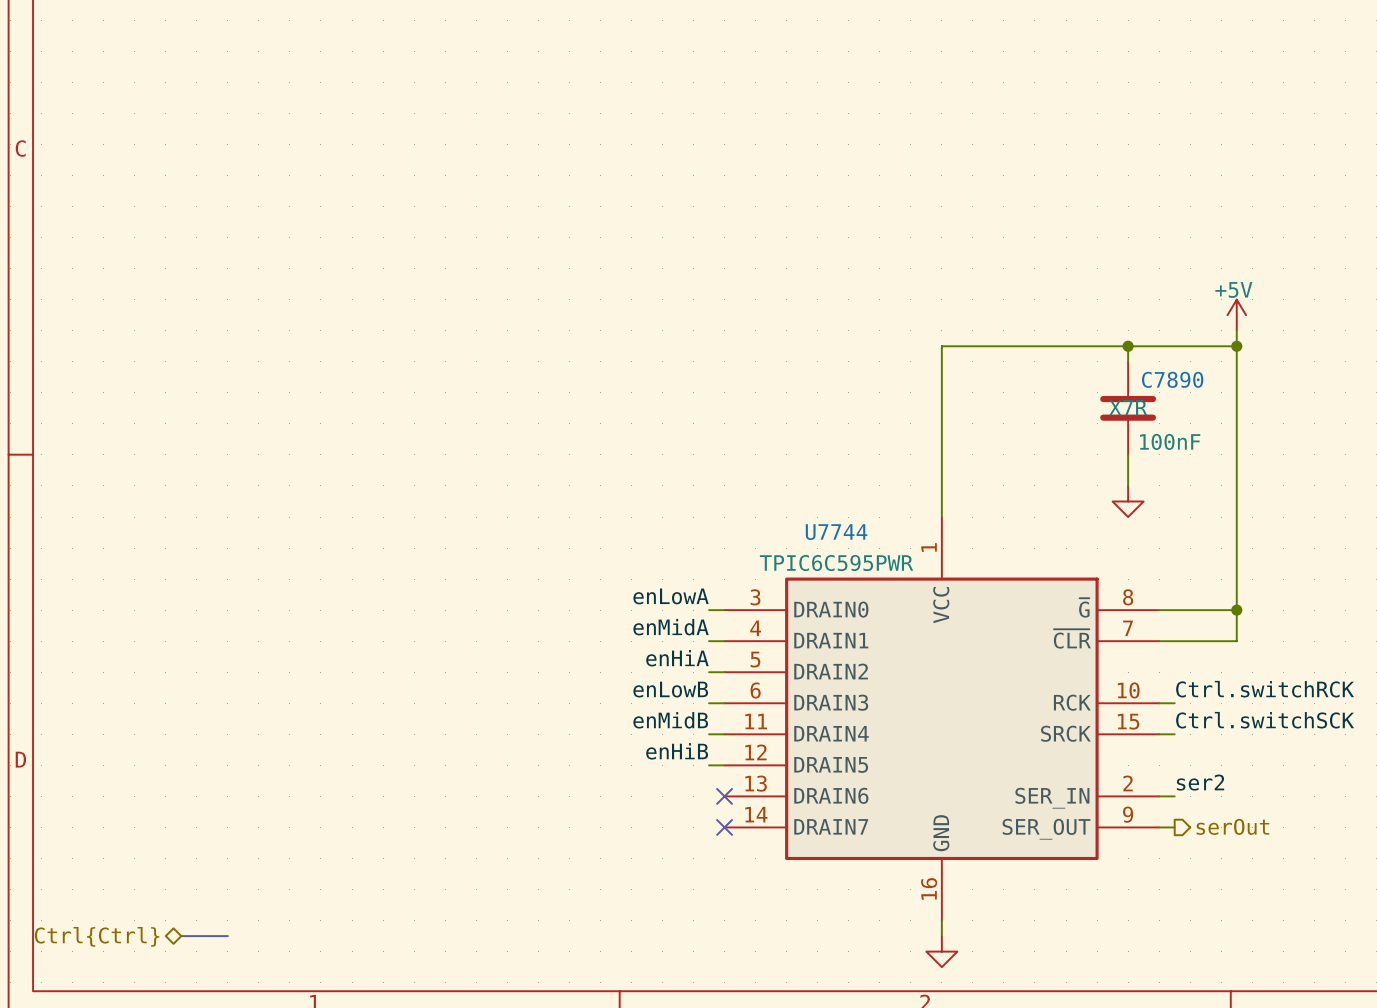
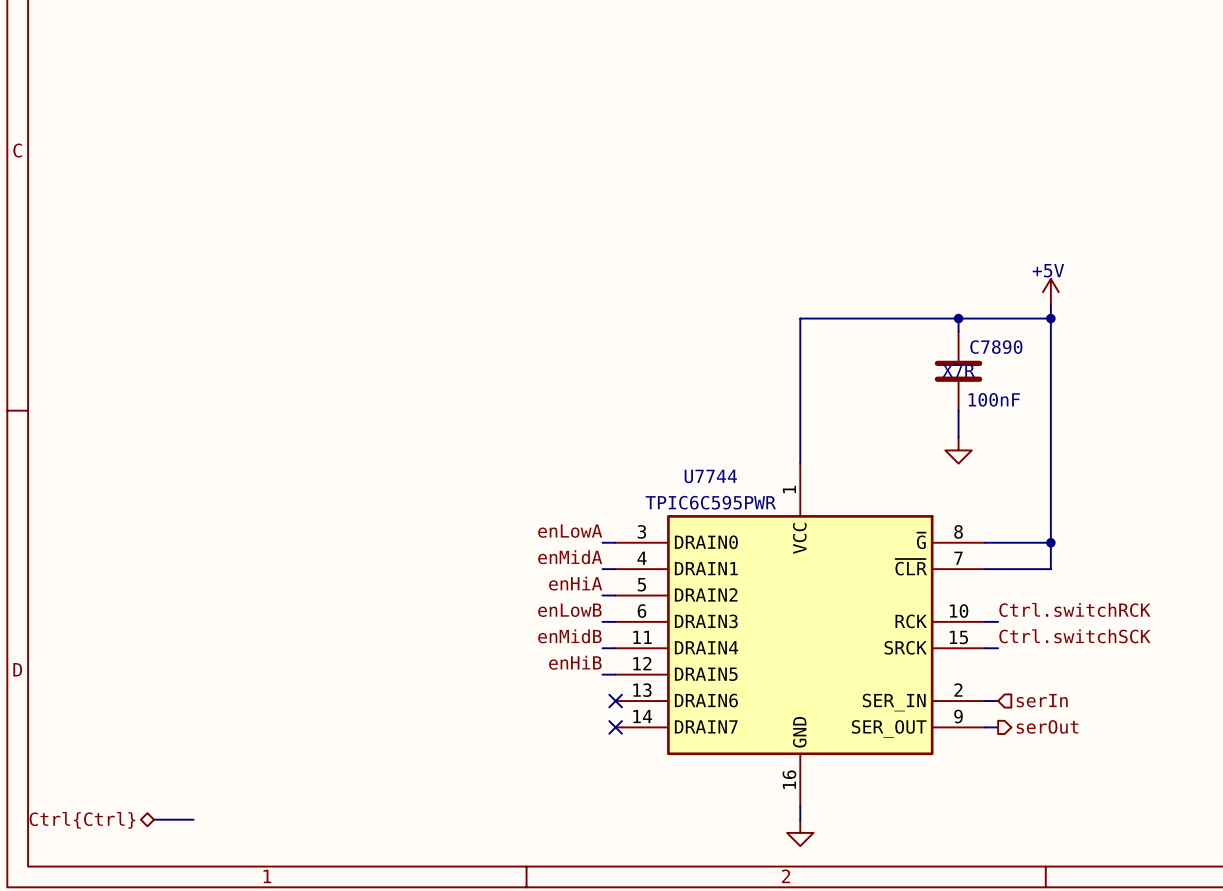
label: ser2 (1200, 782) -> none
hierarchical label: none -> serIn (1042, 700)

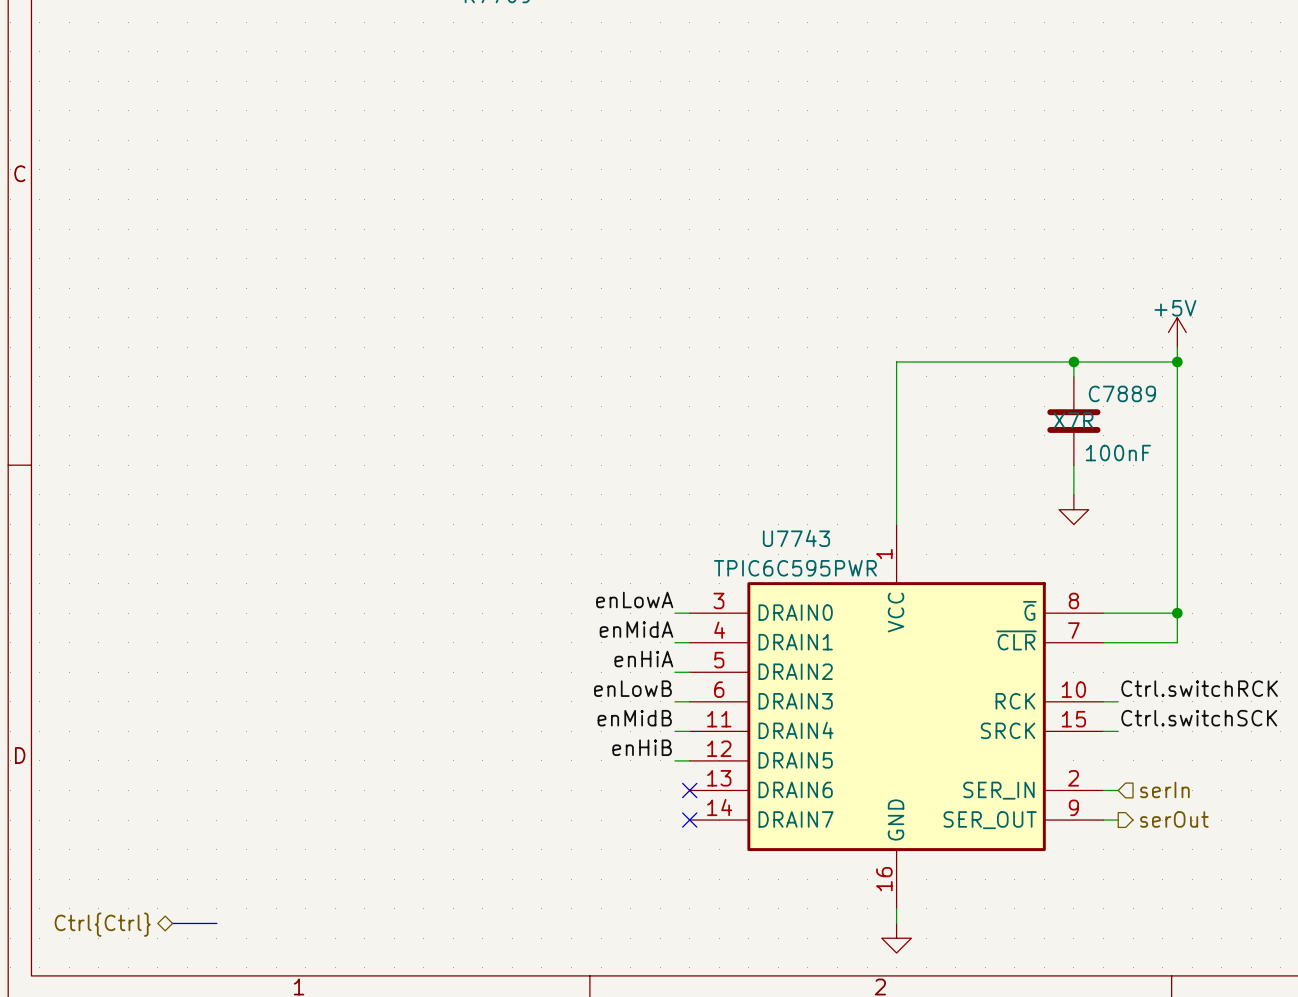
C7890 name: C7890 (996, 347) -> C7889 (1122, 393)
U7744 name: U7744 (710, 476) -> U7743 (796, 538)

